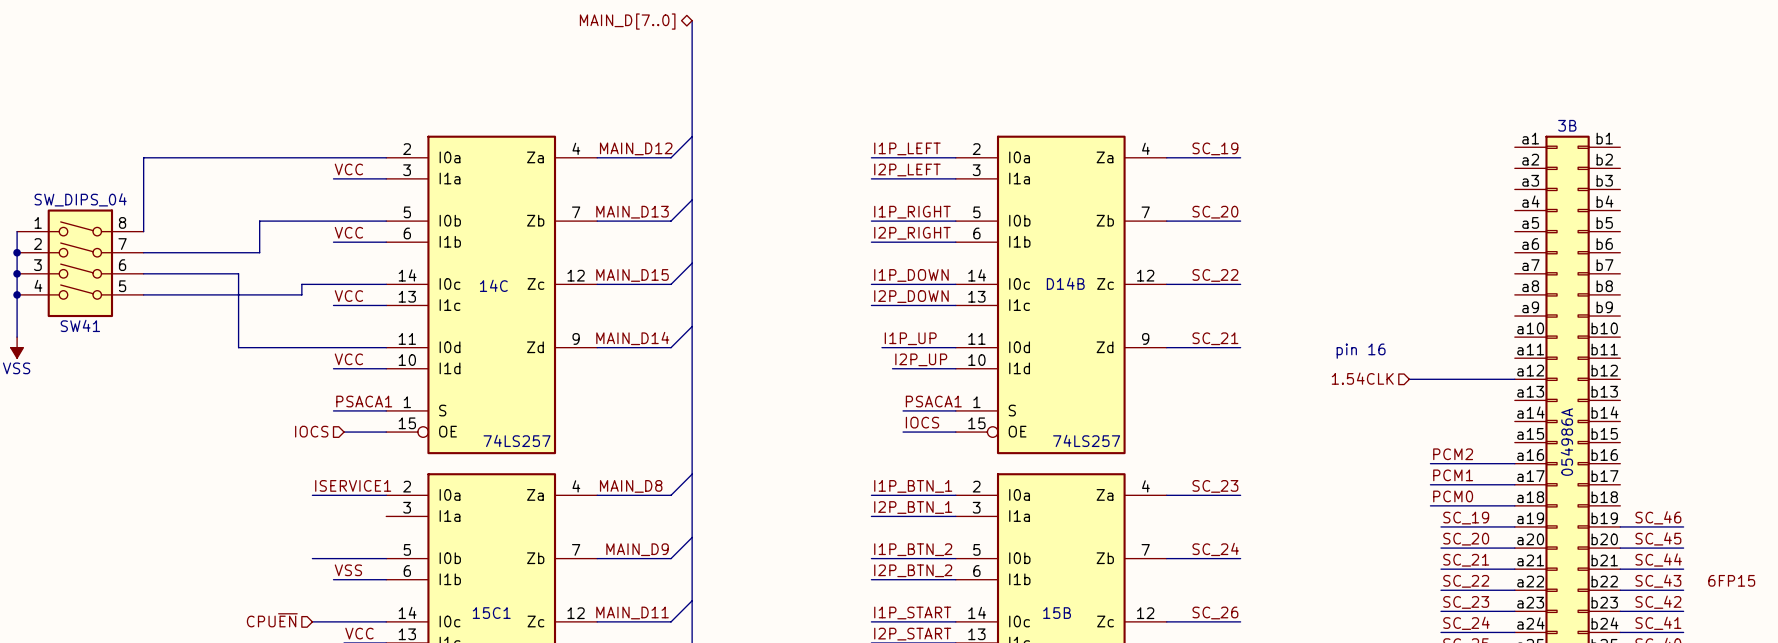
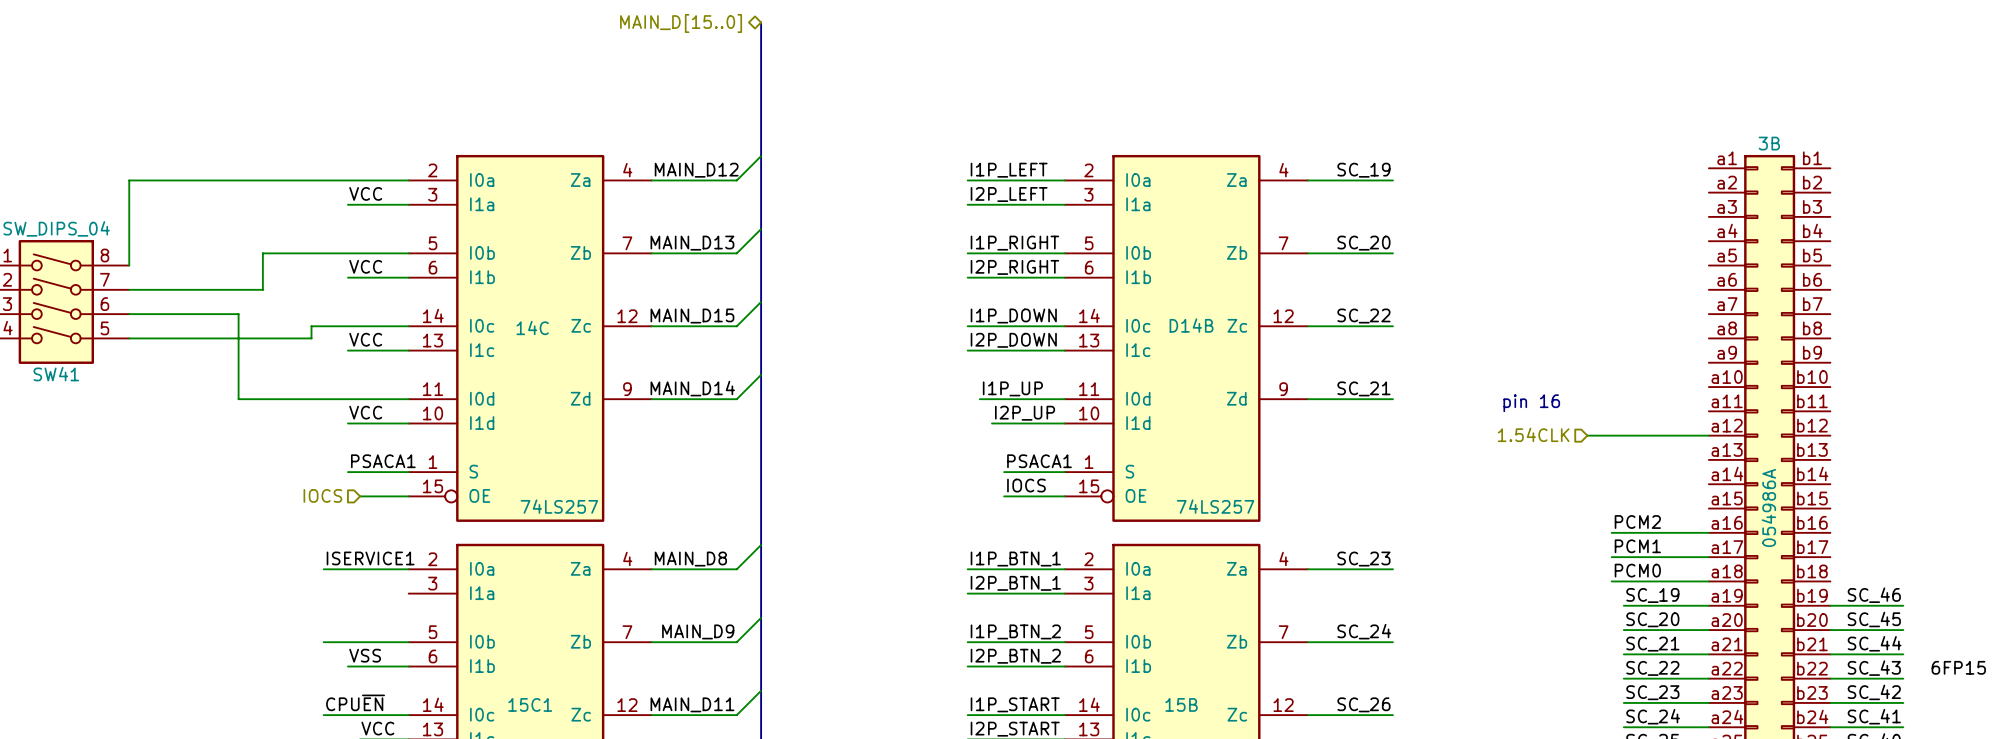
hierarchical label: MAIN_D[7..0] (627, 21) -> MAIN_D[15..0] (681, 23)
label: none -> CPU~{EN} (355, 702)
hierarchical label: CPU~{EN} (272, 620) -> none

